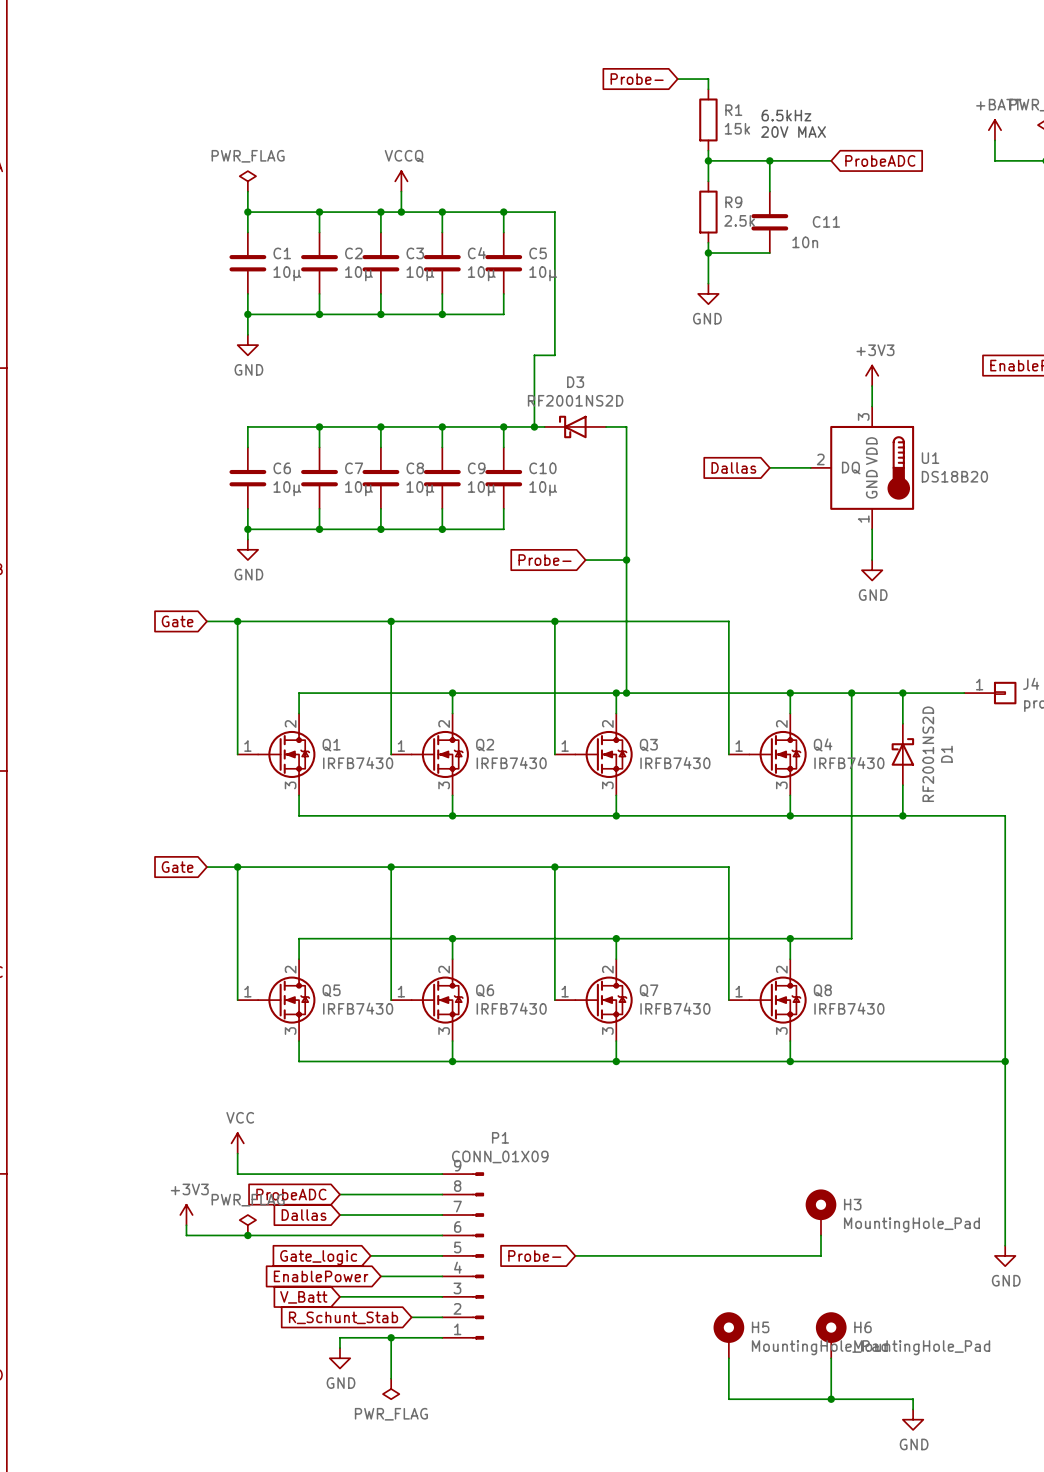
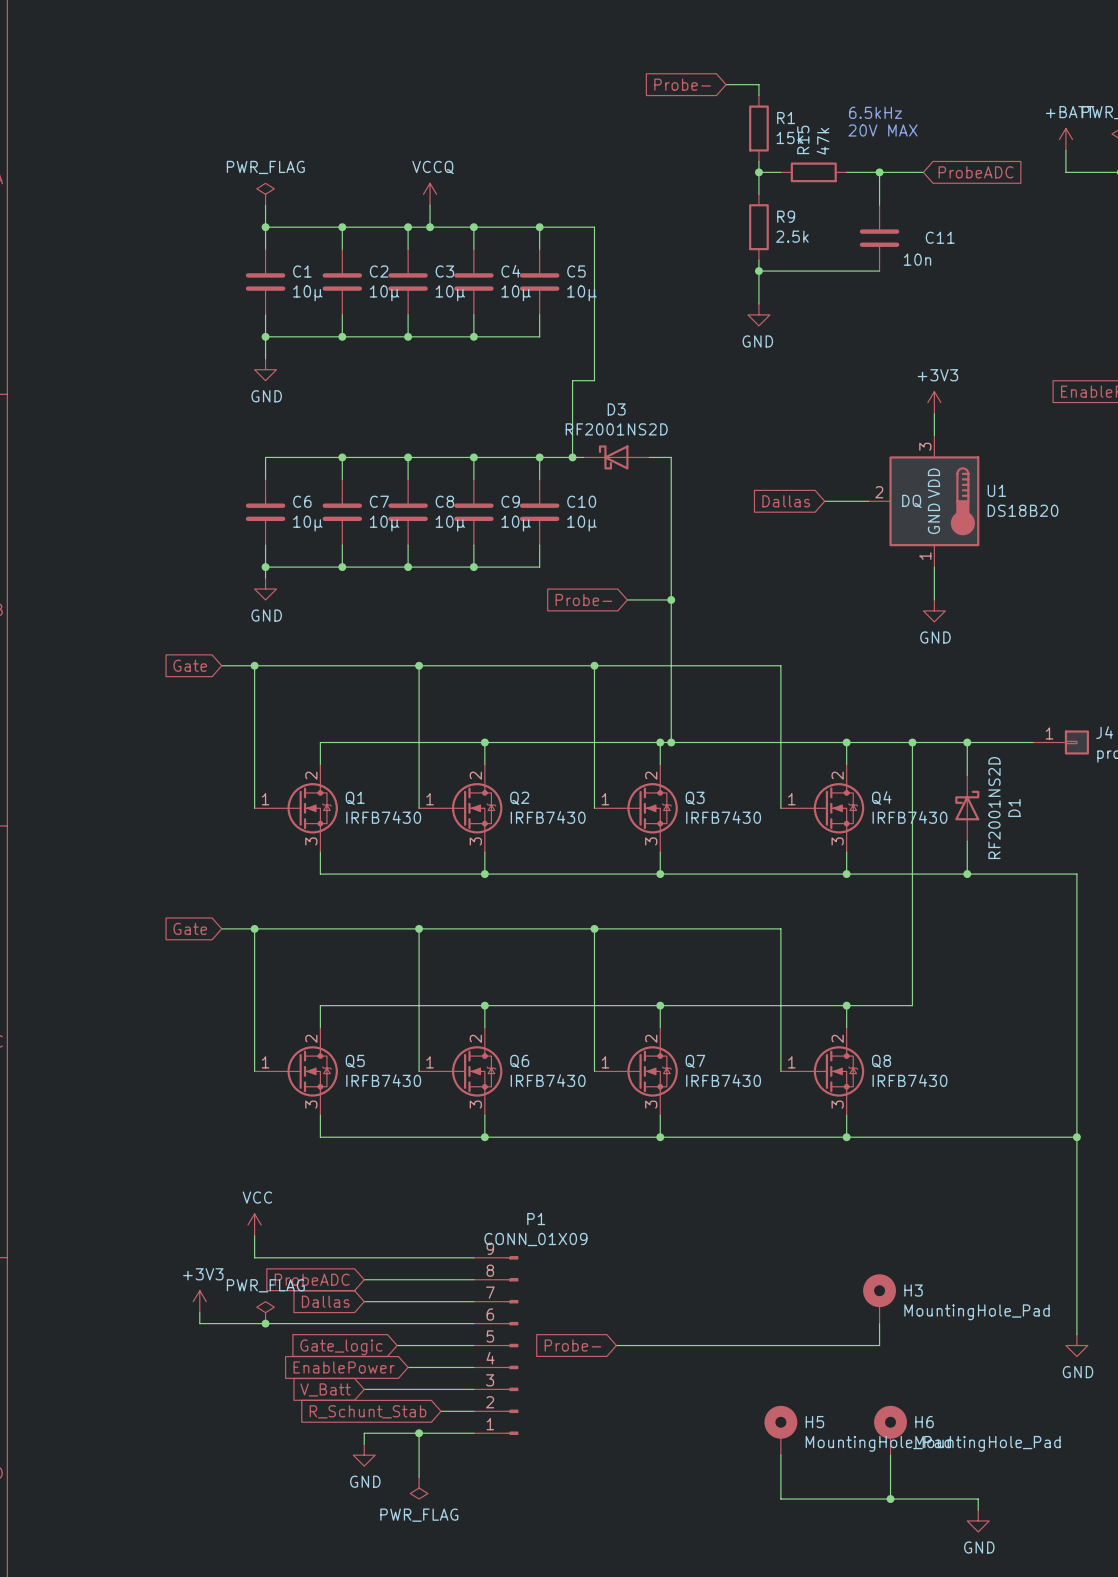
text position: 6.5kHz (786, 115) -> 6.5kHz (875, 112)
text position: 20V MAX (793, 132) -> 20V MAX (883, 130)
wire: (728, 160) (790, 160) -> none
R15: none -> 47k (813, 172)
wire: (769, 160) (769, 191) -> (879, 172) (879, 205)
junction: (769, 160) -> none
junction: none -> (879, 172)
wire: none -> (890, 172) (923, 172)
global label position: ProbeADC (880, 160) -> ProbeADC (976, 172)
C11 position: (769, 222) -> (879, 238)
wire: none -> (824, 271) (879, 271)

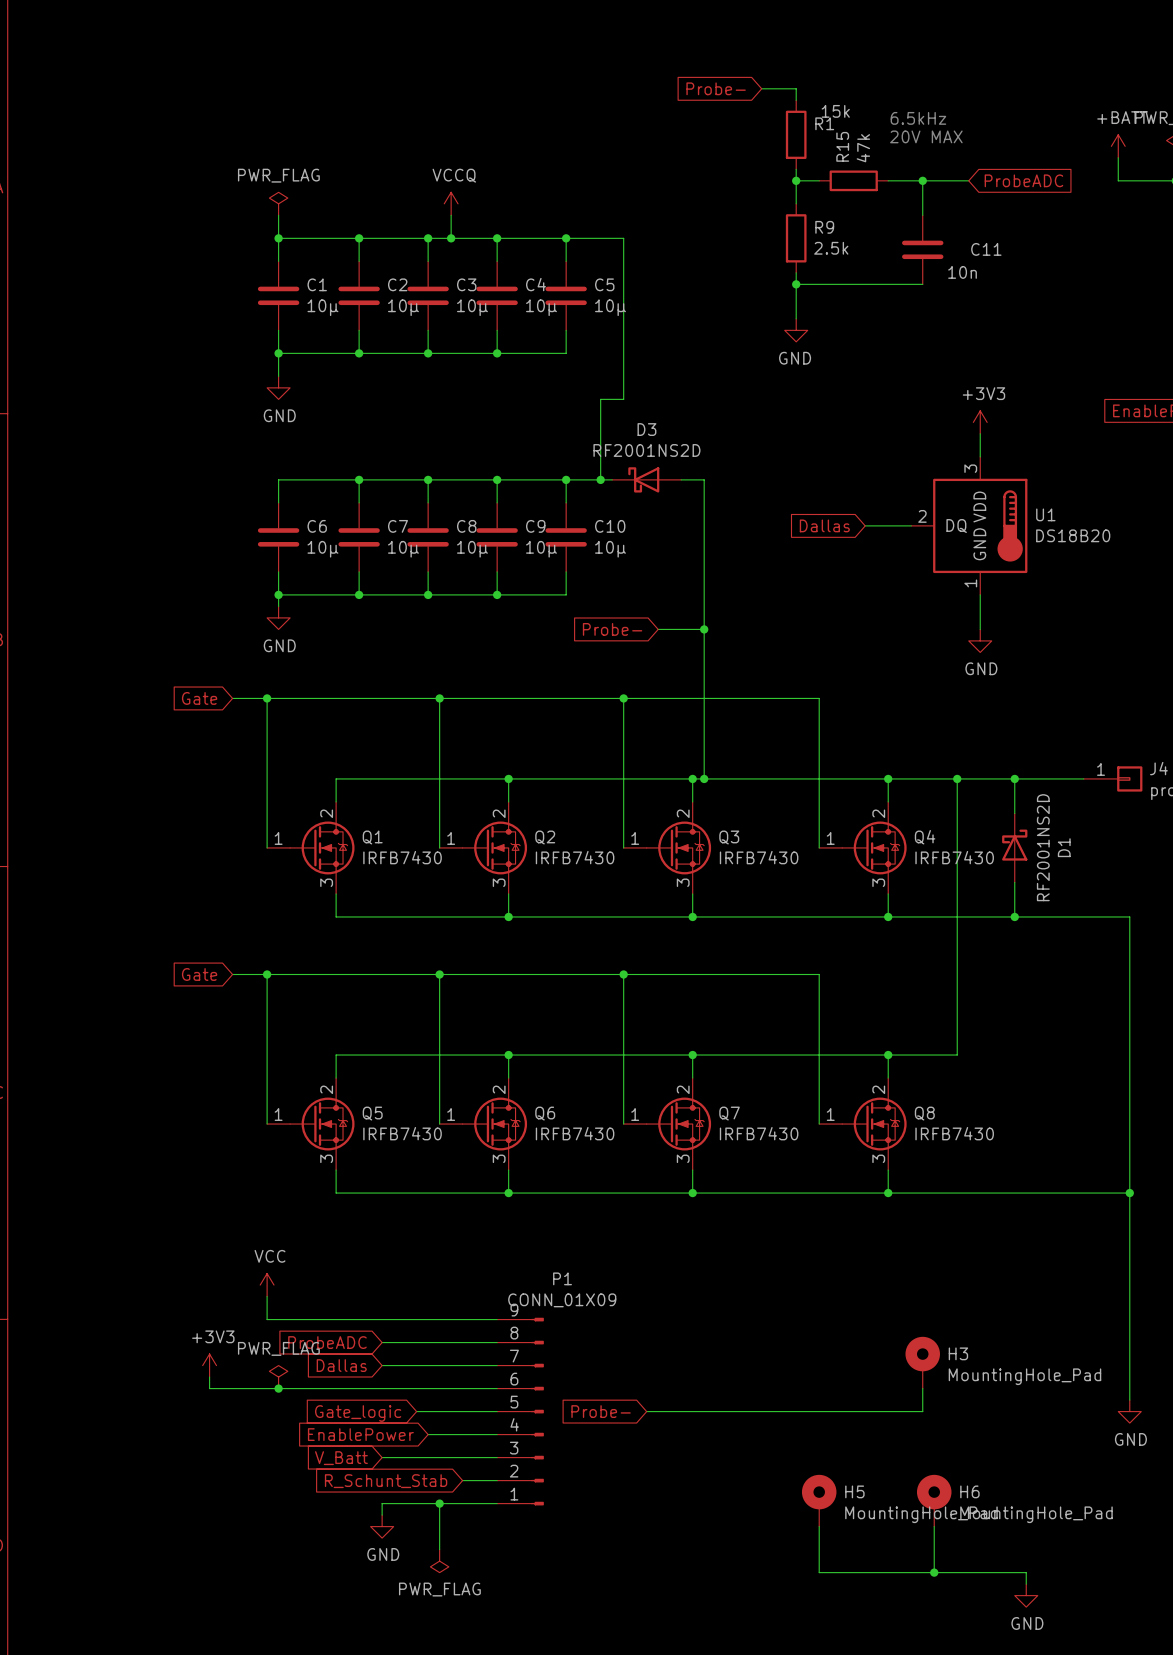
R1 value position: 15k (790, 137) -> 15k (835, 111)

